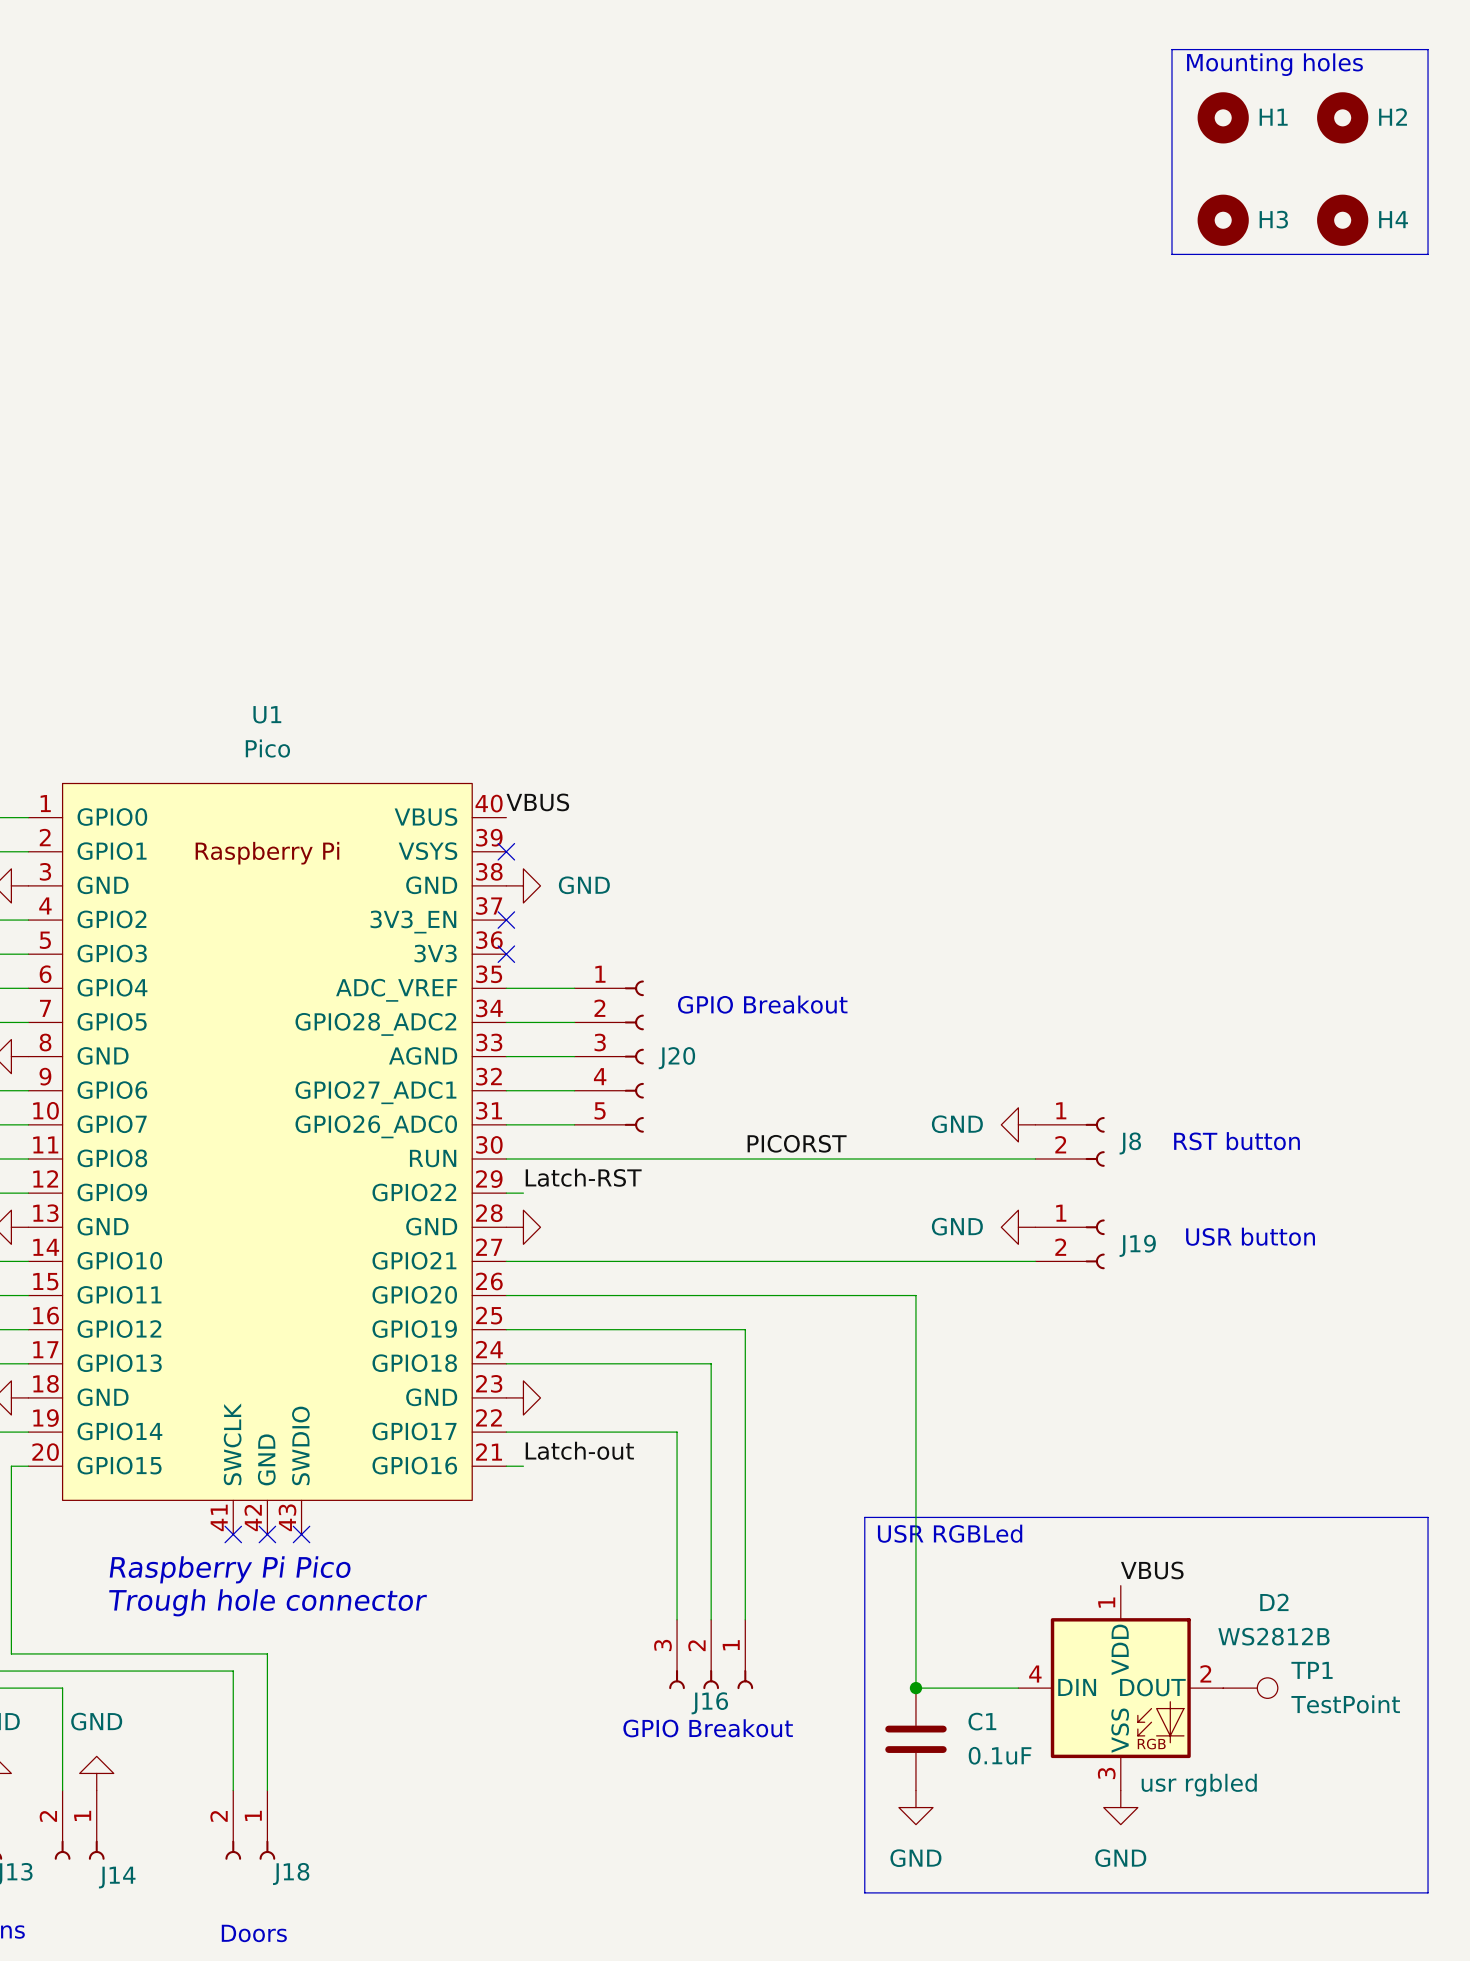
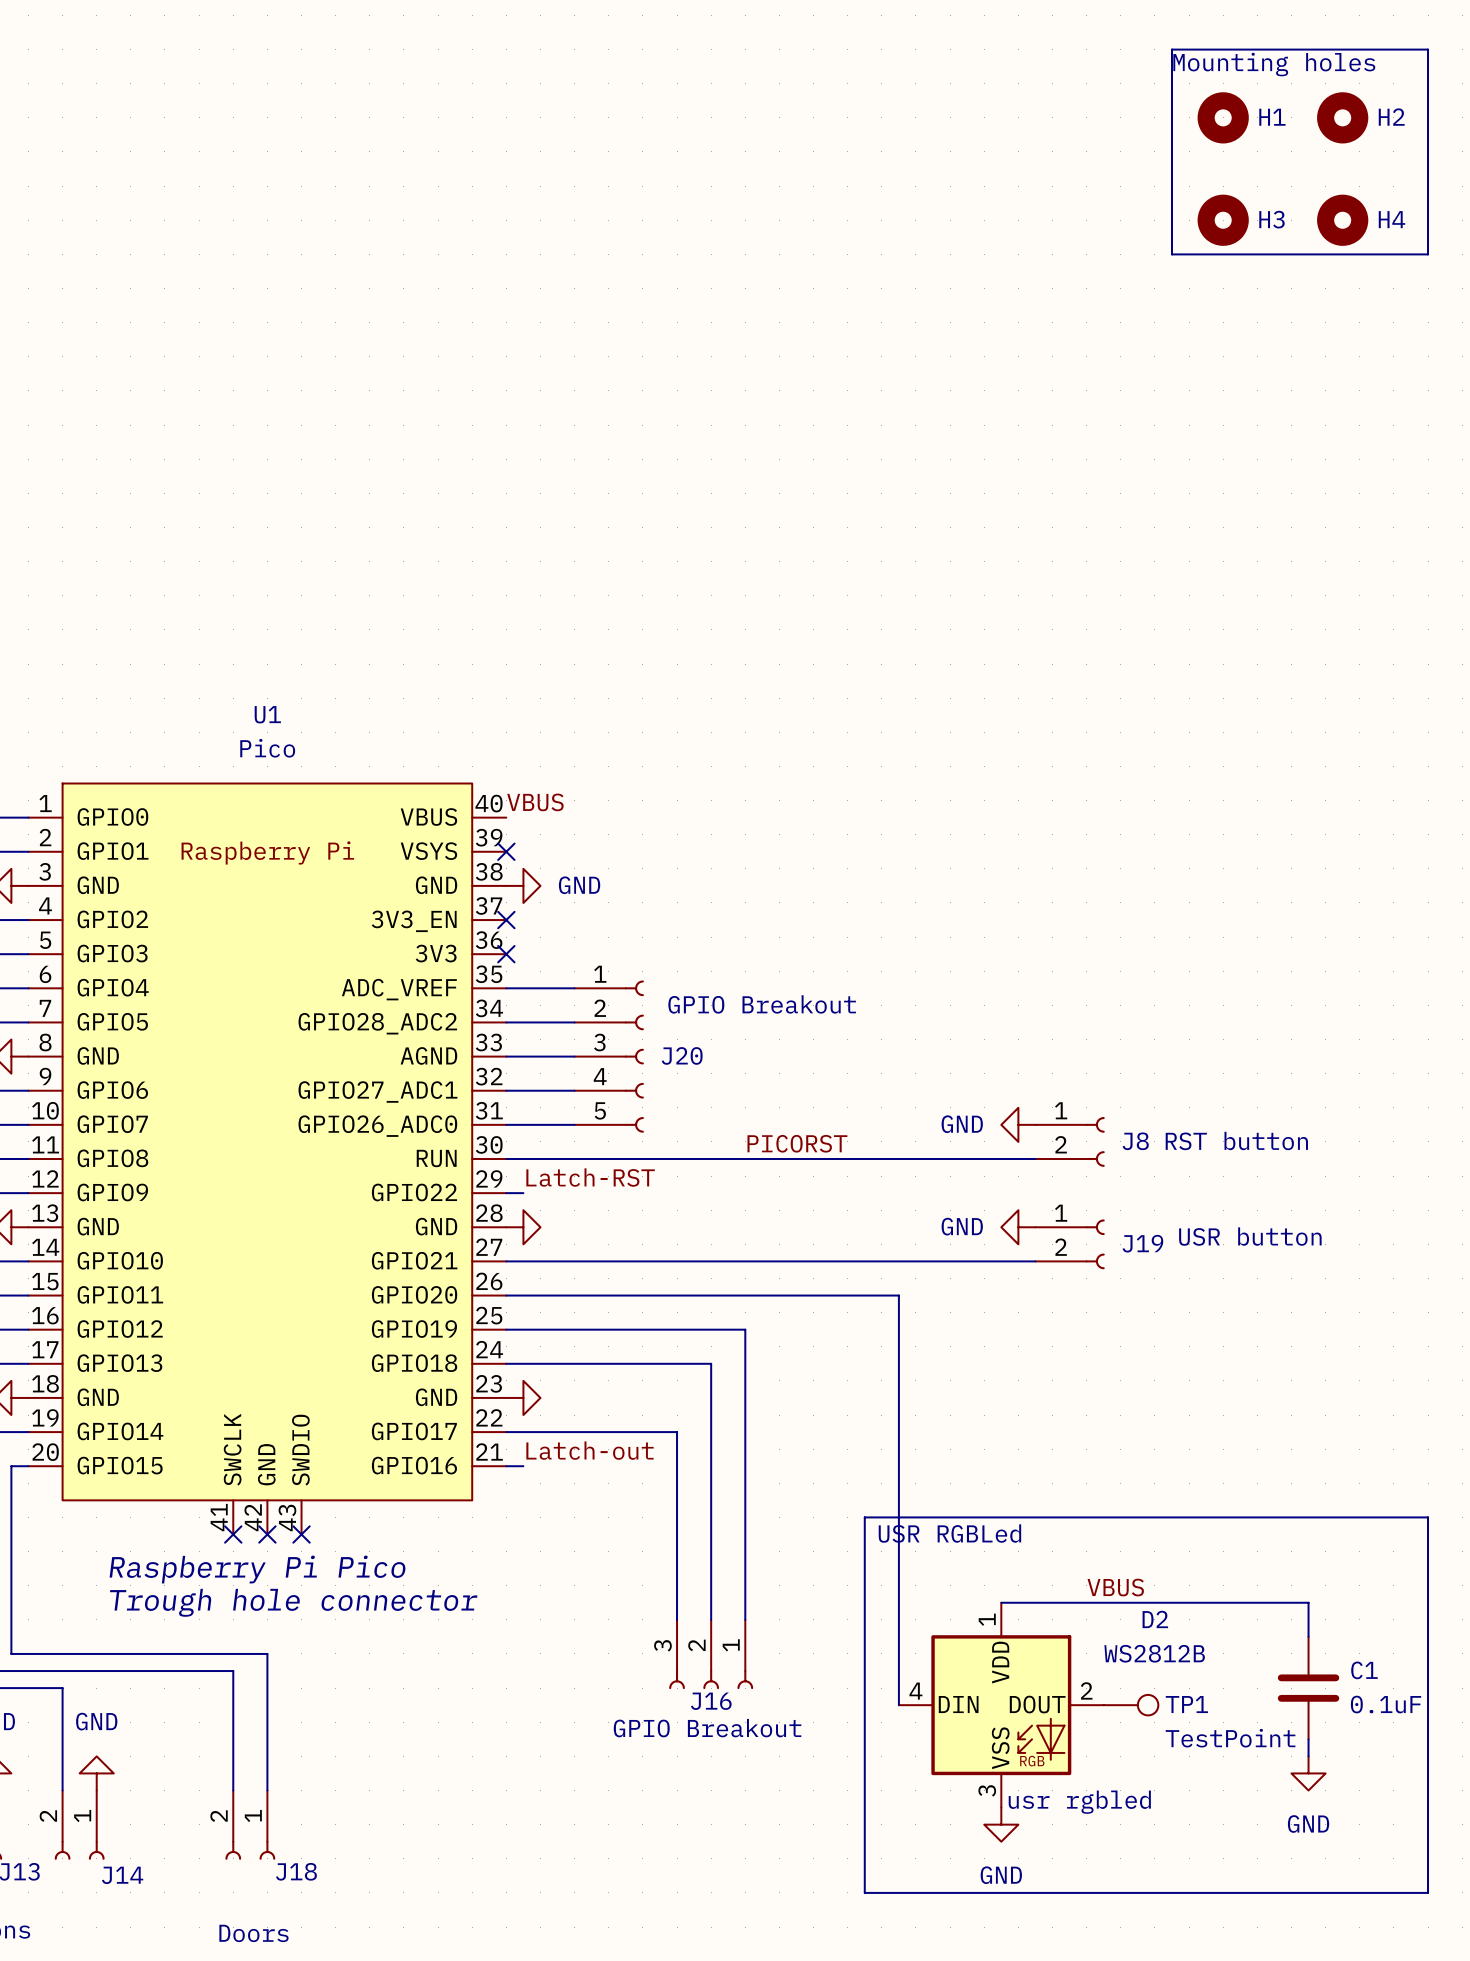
wire: (898, 1295) (915, 1295) (915, 1688) (1018, 1688) -> (898, 1295) (898, 1705)
label position: VBUS (1152, 1570) -> VBUS (1115, 1587)
wire: none -> (1001, 1602) (1308, 1602) (1308, 1636)
TP1 name position: TP1 (1312, 1670) -> TP1 (1186, 1704)
junction: (915, 1688) -> none
D2 position: (1120, 1688) -> (1001, 1705)
TP1 position: (1250, 1688) -> (1131, 1705)
TP1 value position: TestPoint (1345, 1704) -> TestPoint (1230, 1738)
C1 name position: C1 (982, 1721) -> C1 (1364, 1670)
C1 position: (915, 1739) -> (1308, 1688)
wire: none -> (1308, 1739) (1308, 1756)
C1 value position: 0.1uF (1000, 1755) -> 0.1uF (1386, 1704)
power symbol: none -> GND (1308, 1773)
power symbol: GND (915, 1807) -> none
power symbol: GND (1120, 1807) -> none
power symbol: none -> GND (1001, 1824)

